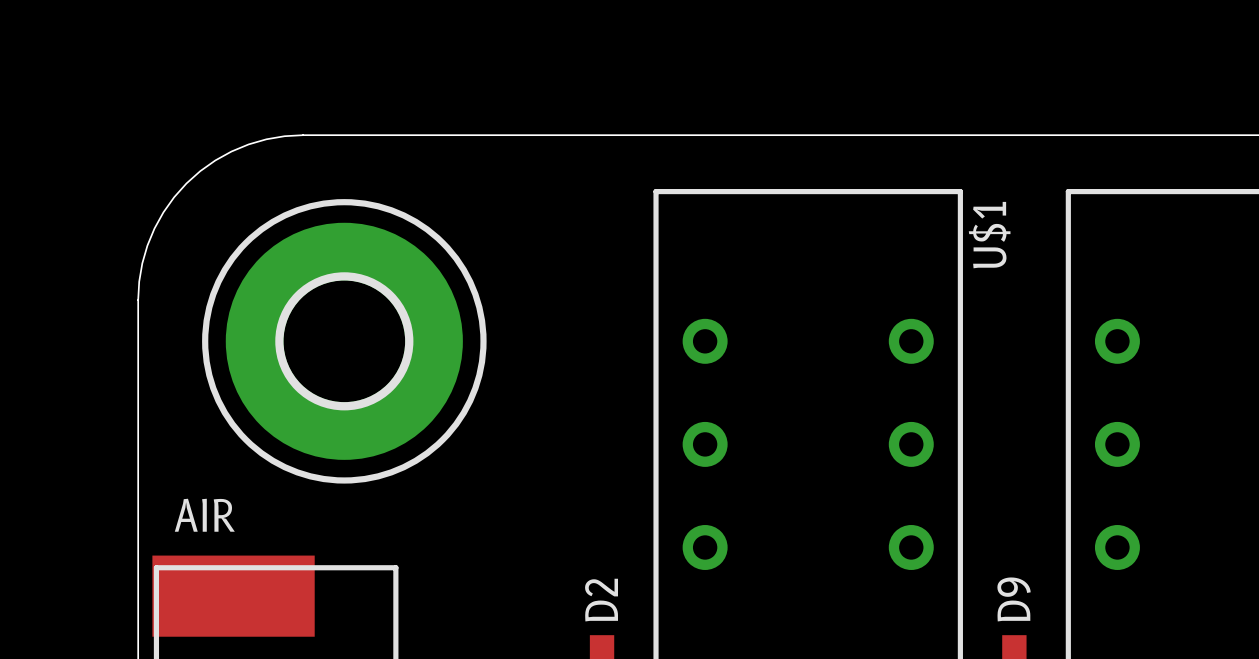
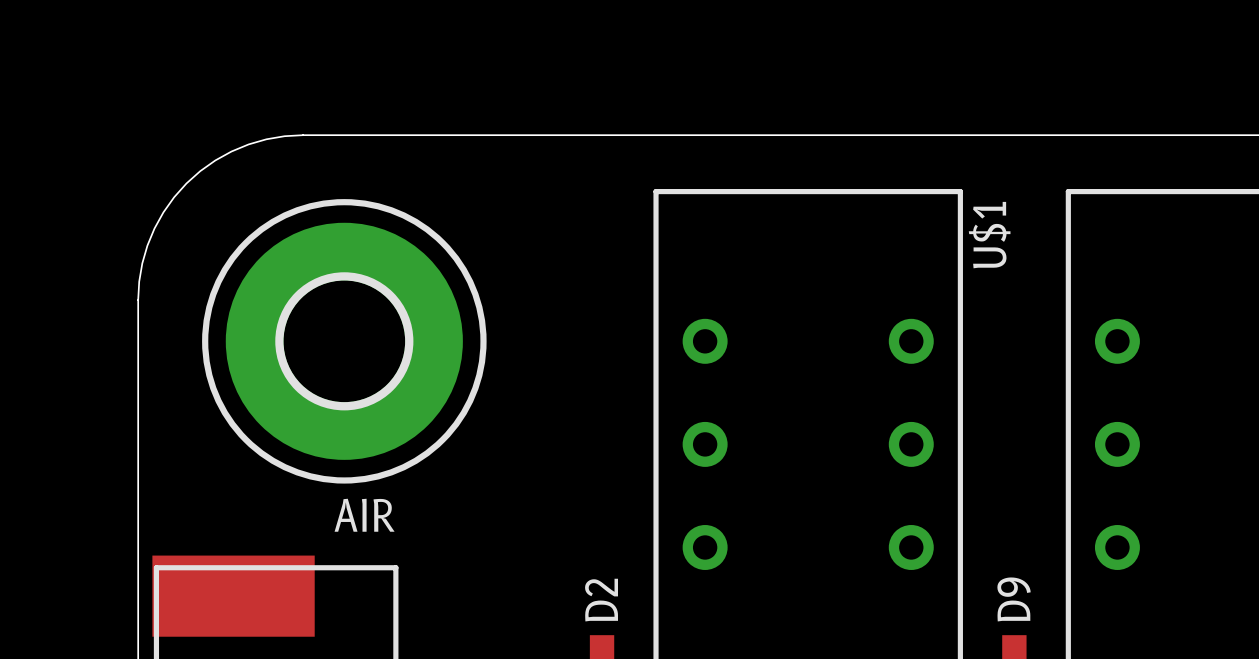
AIR name position: AIR (204, 515) -> AIR (364, 515)

